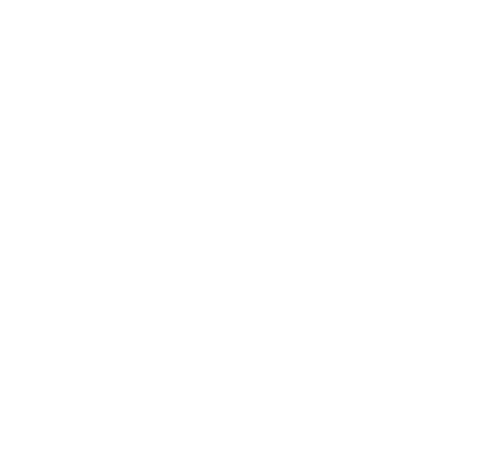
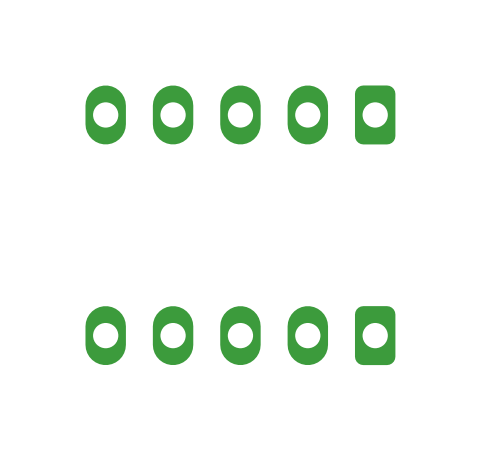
part: none -> (240, 114)
part: none -> (240, 335)

